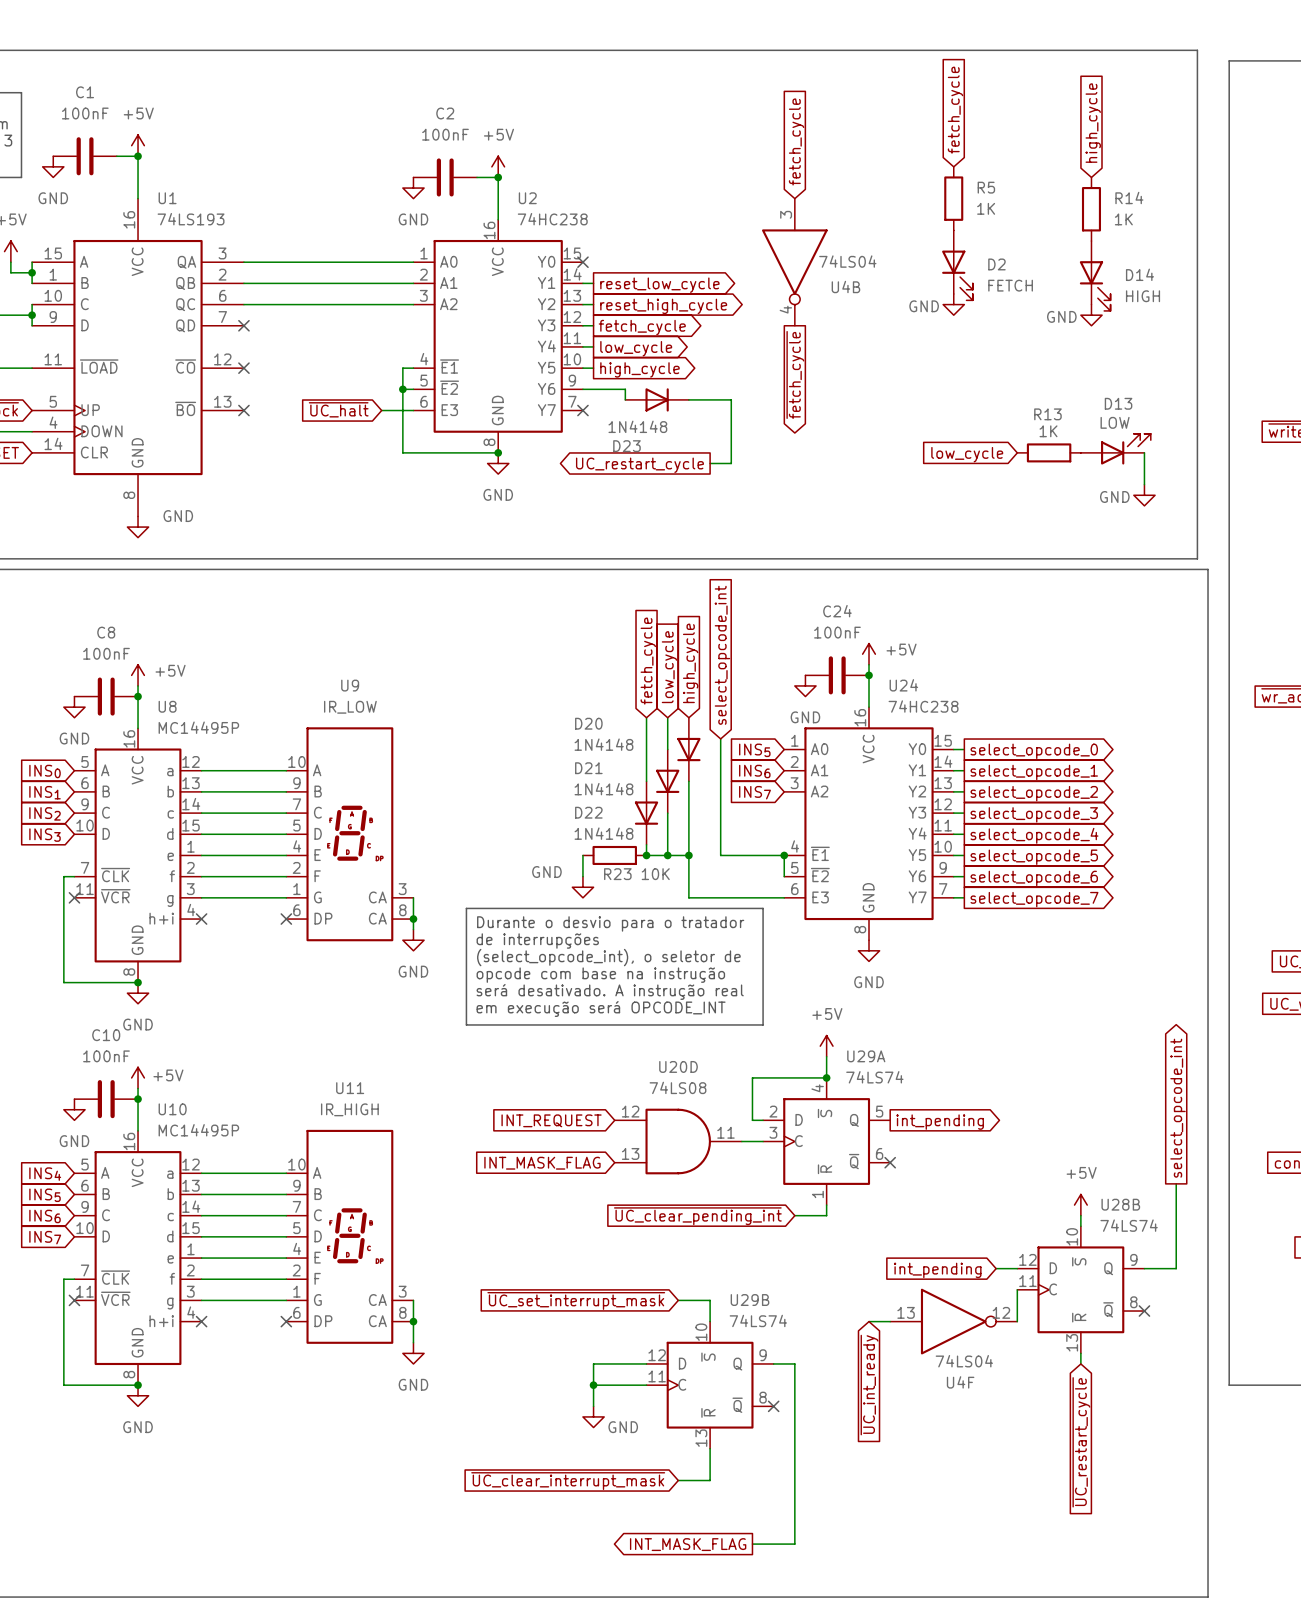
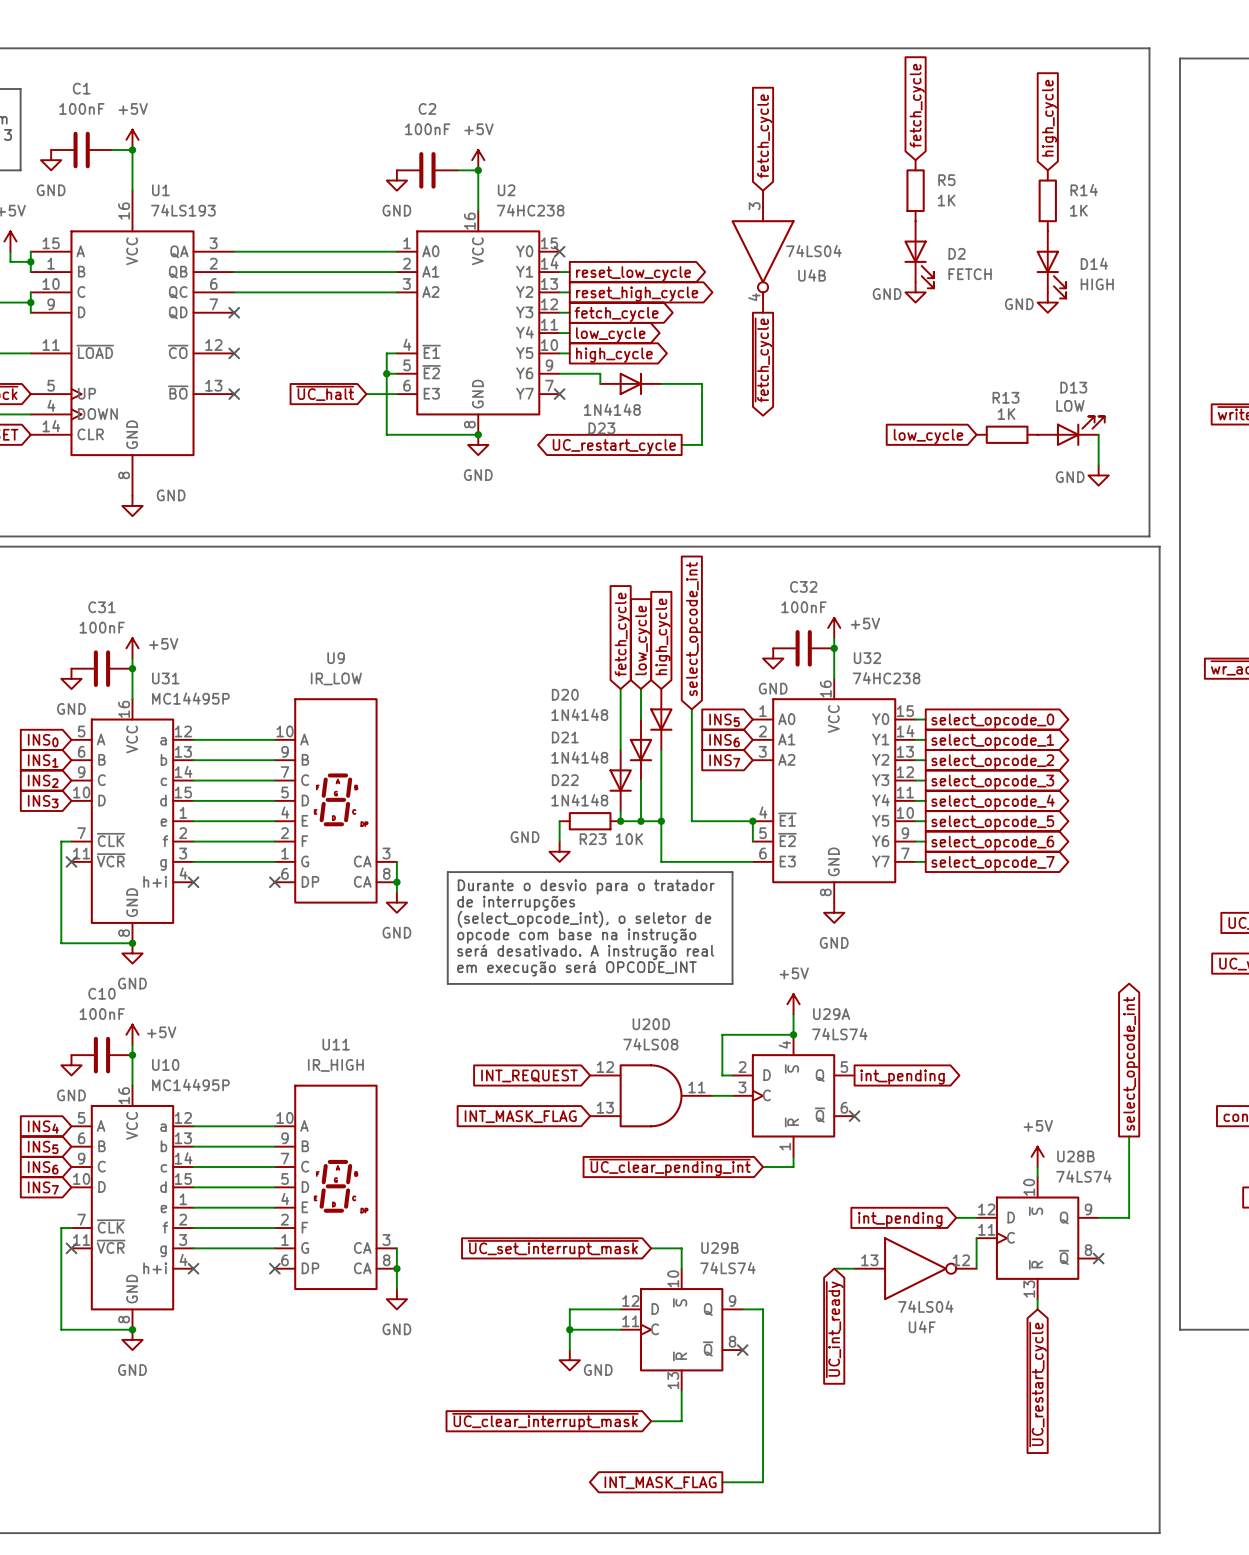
C24 name: C24 (837, 611) -> C32 (803, 586)
C8 name: C8 (106, 632) -> C31 (101, 607)
U24 name: U24 (903, 685) -> U32 (867, 658)
U8 name: U8 (167, 706) -> U31 (165, 678)

